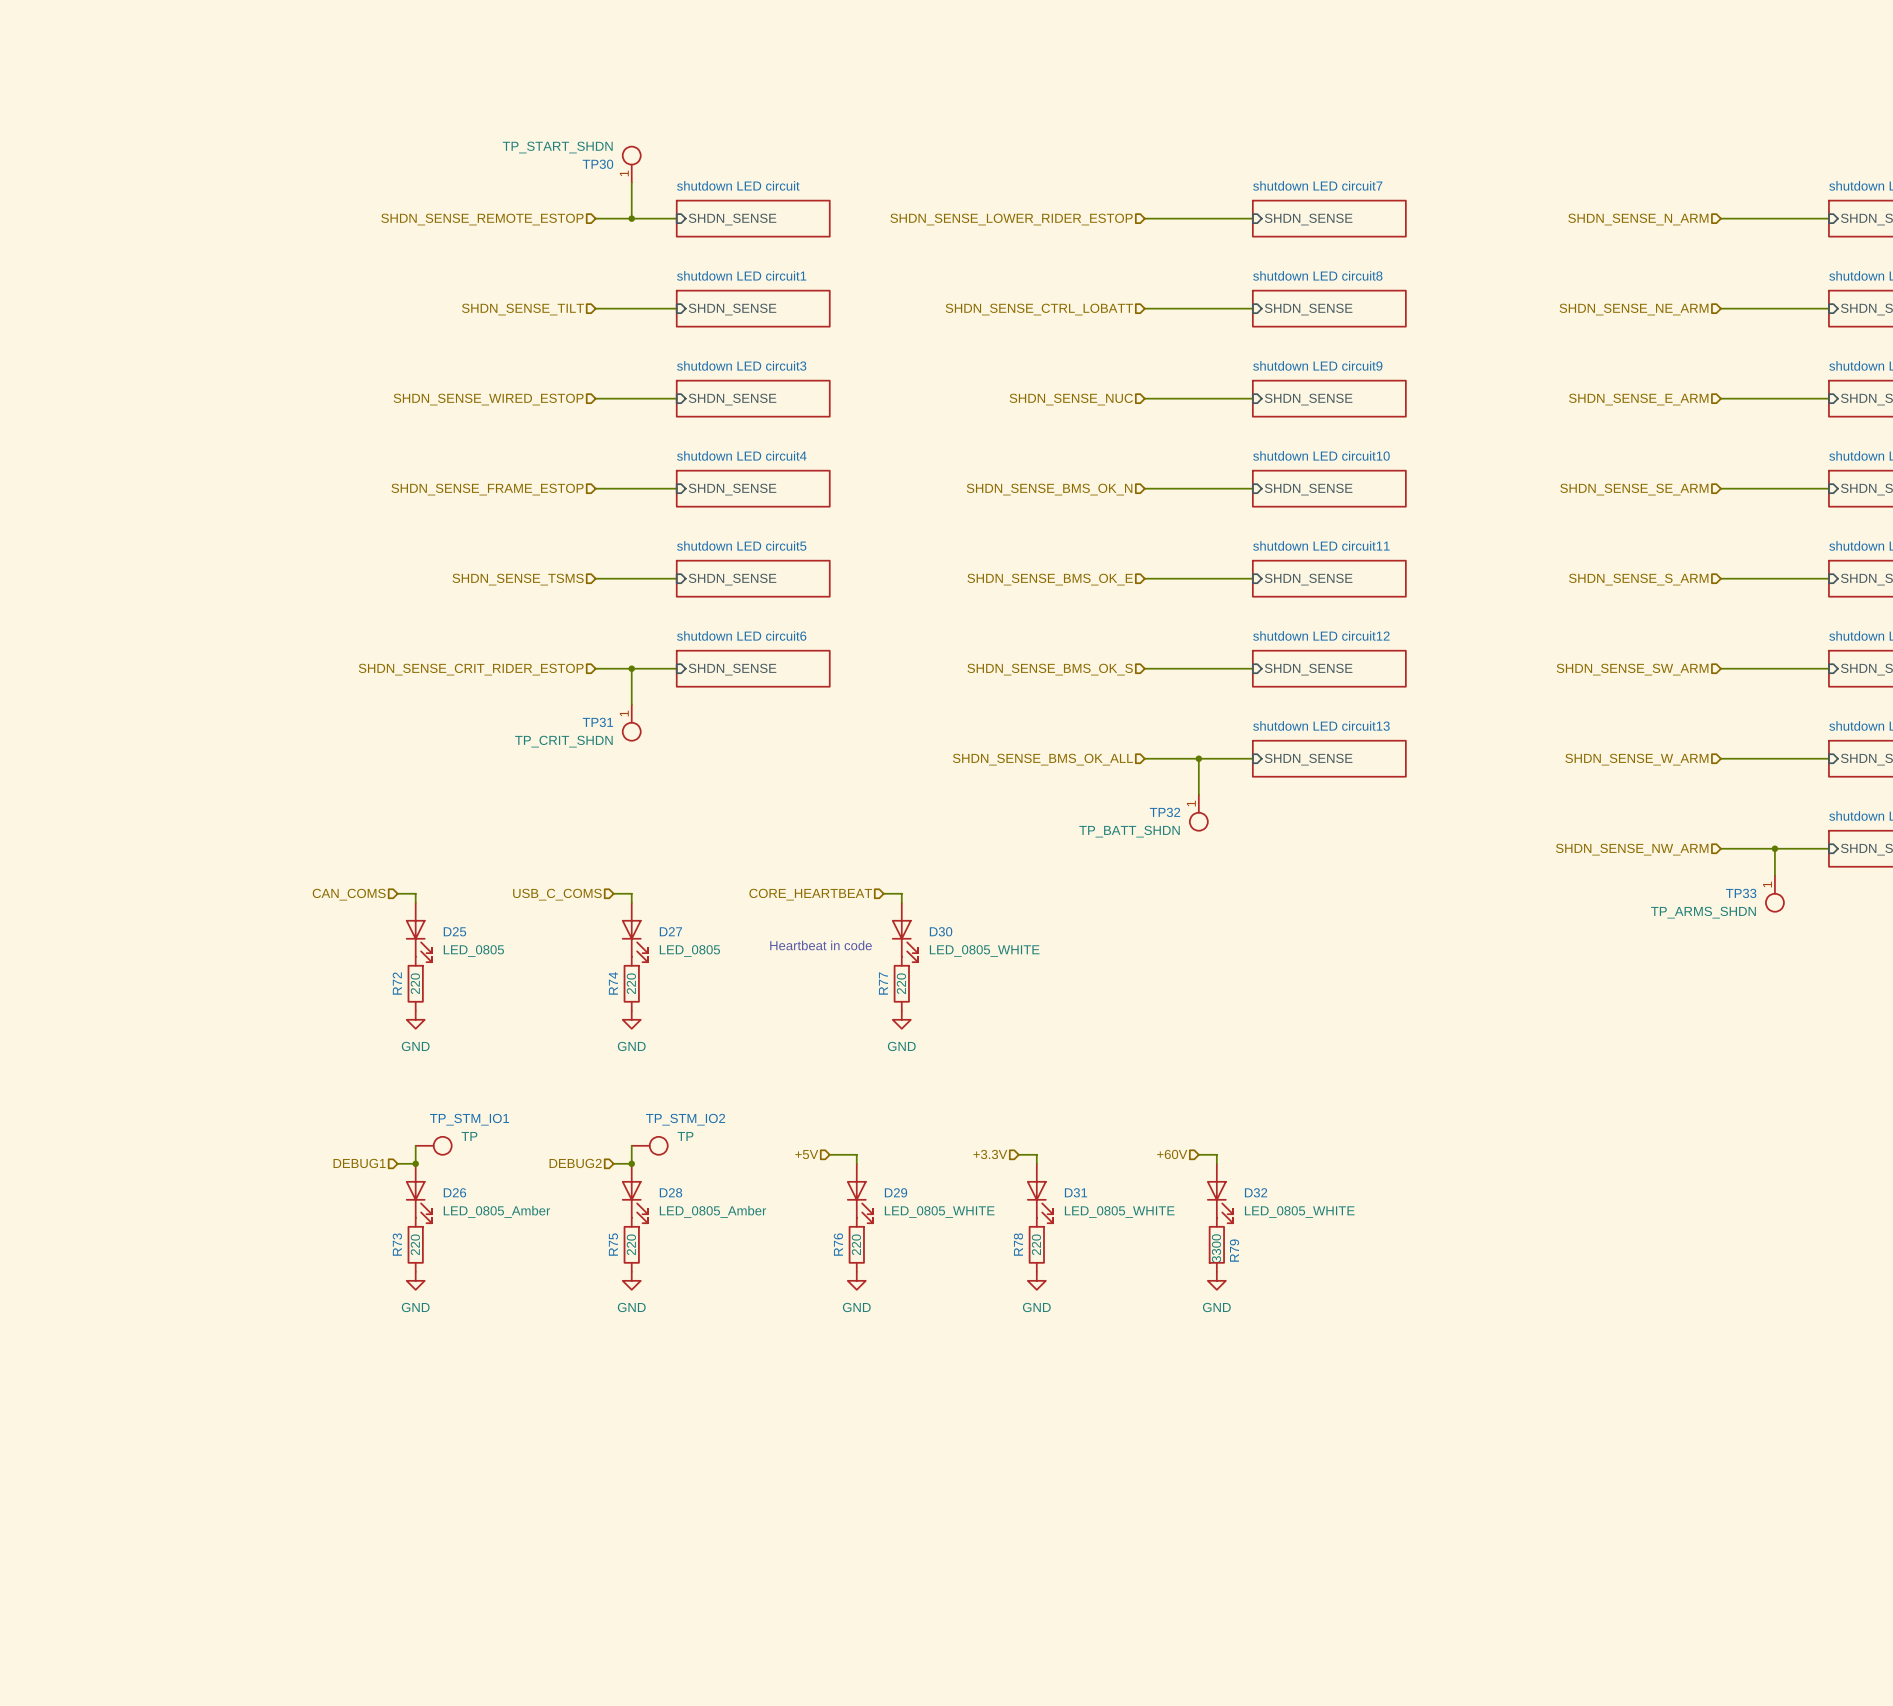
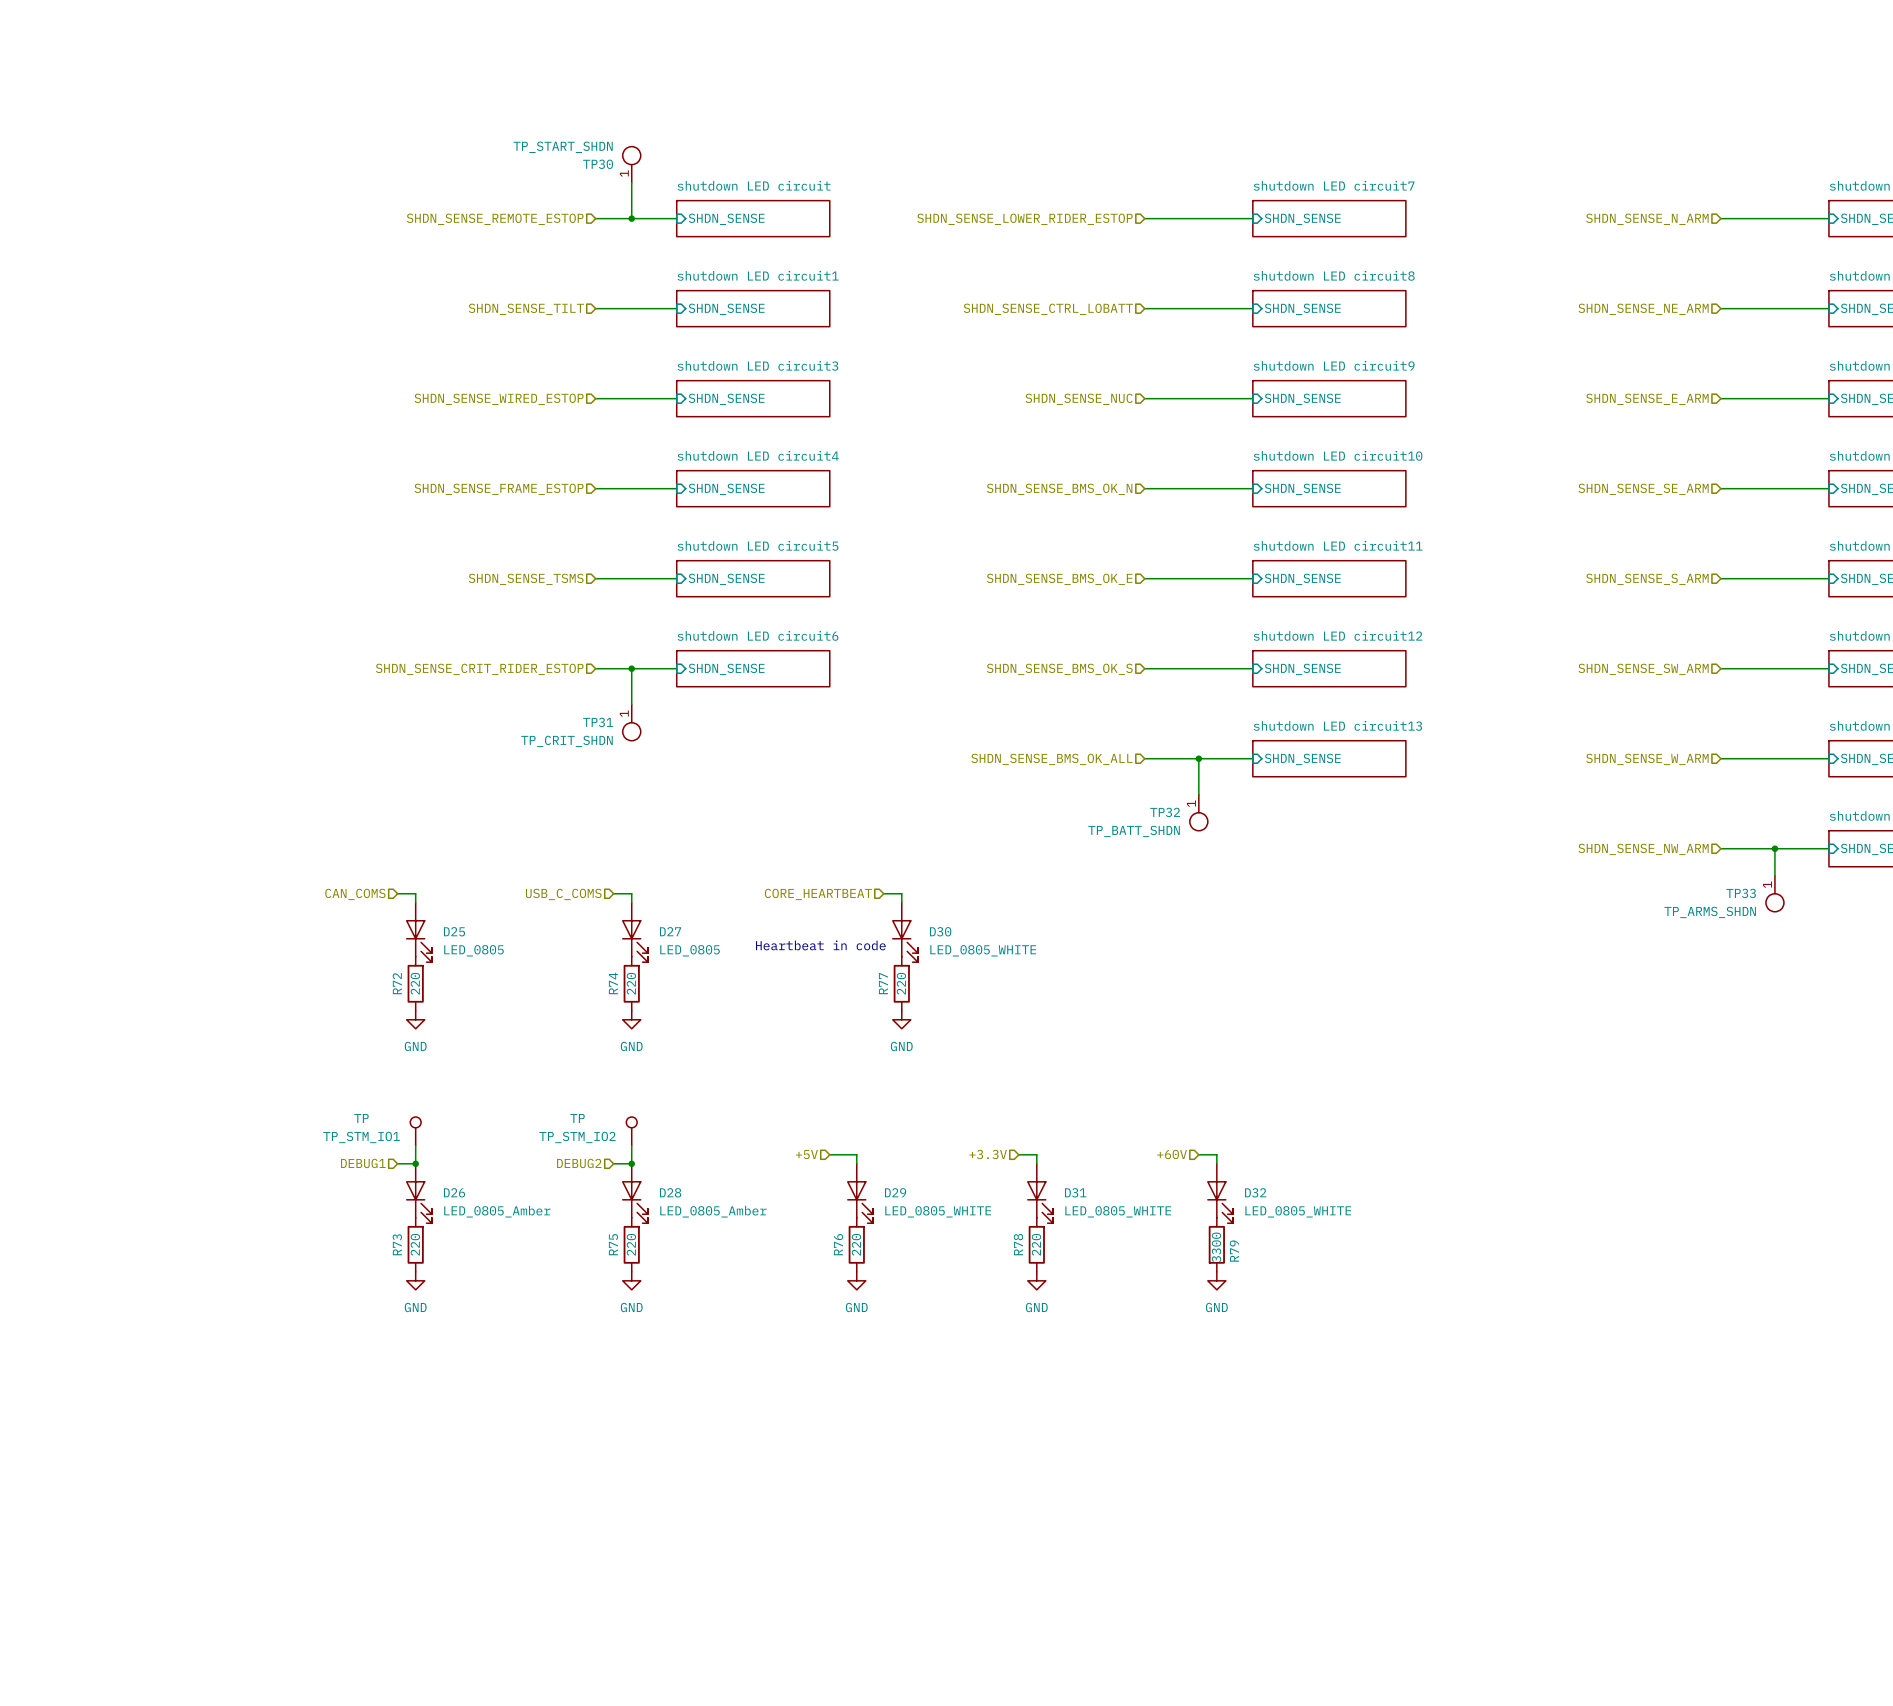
TP_STM_IO1 name position: TP_STM_IO1 (469, 1119) -> TP_STM_IO1 (361, 1137)
TP_STM_IO2 name position: TP_STM_IO2 (685, 1119) -> TP_STM_IO2 (577, 1137)
TP_STM_IO1 symbol: [415, 1136, 452, 1155] -> [410, 1117, 422, 1146]
TP_STM_IO1 value position: TP (469, 1136) -> TP (361, 1118)
TP_STM_IO2 symbol: [631, 1136, 668, 1155] -> [626, 1117, 638, 1146]
TP_STM_IO2 value position: TP (685, 1136) -> TP (577, 1118)

